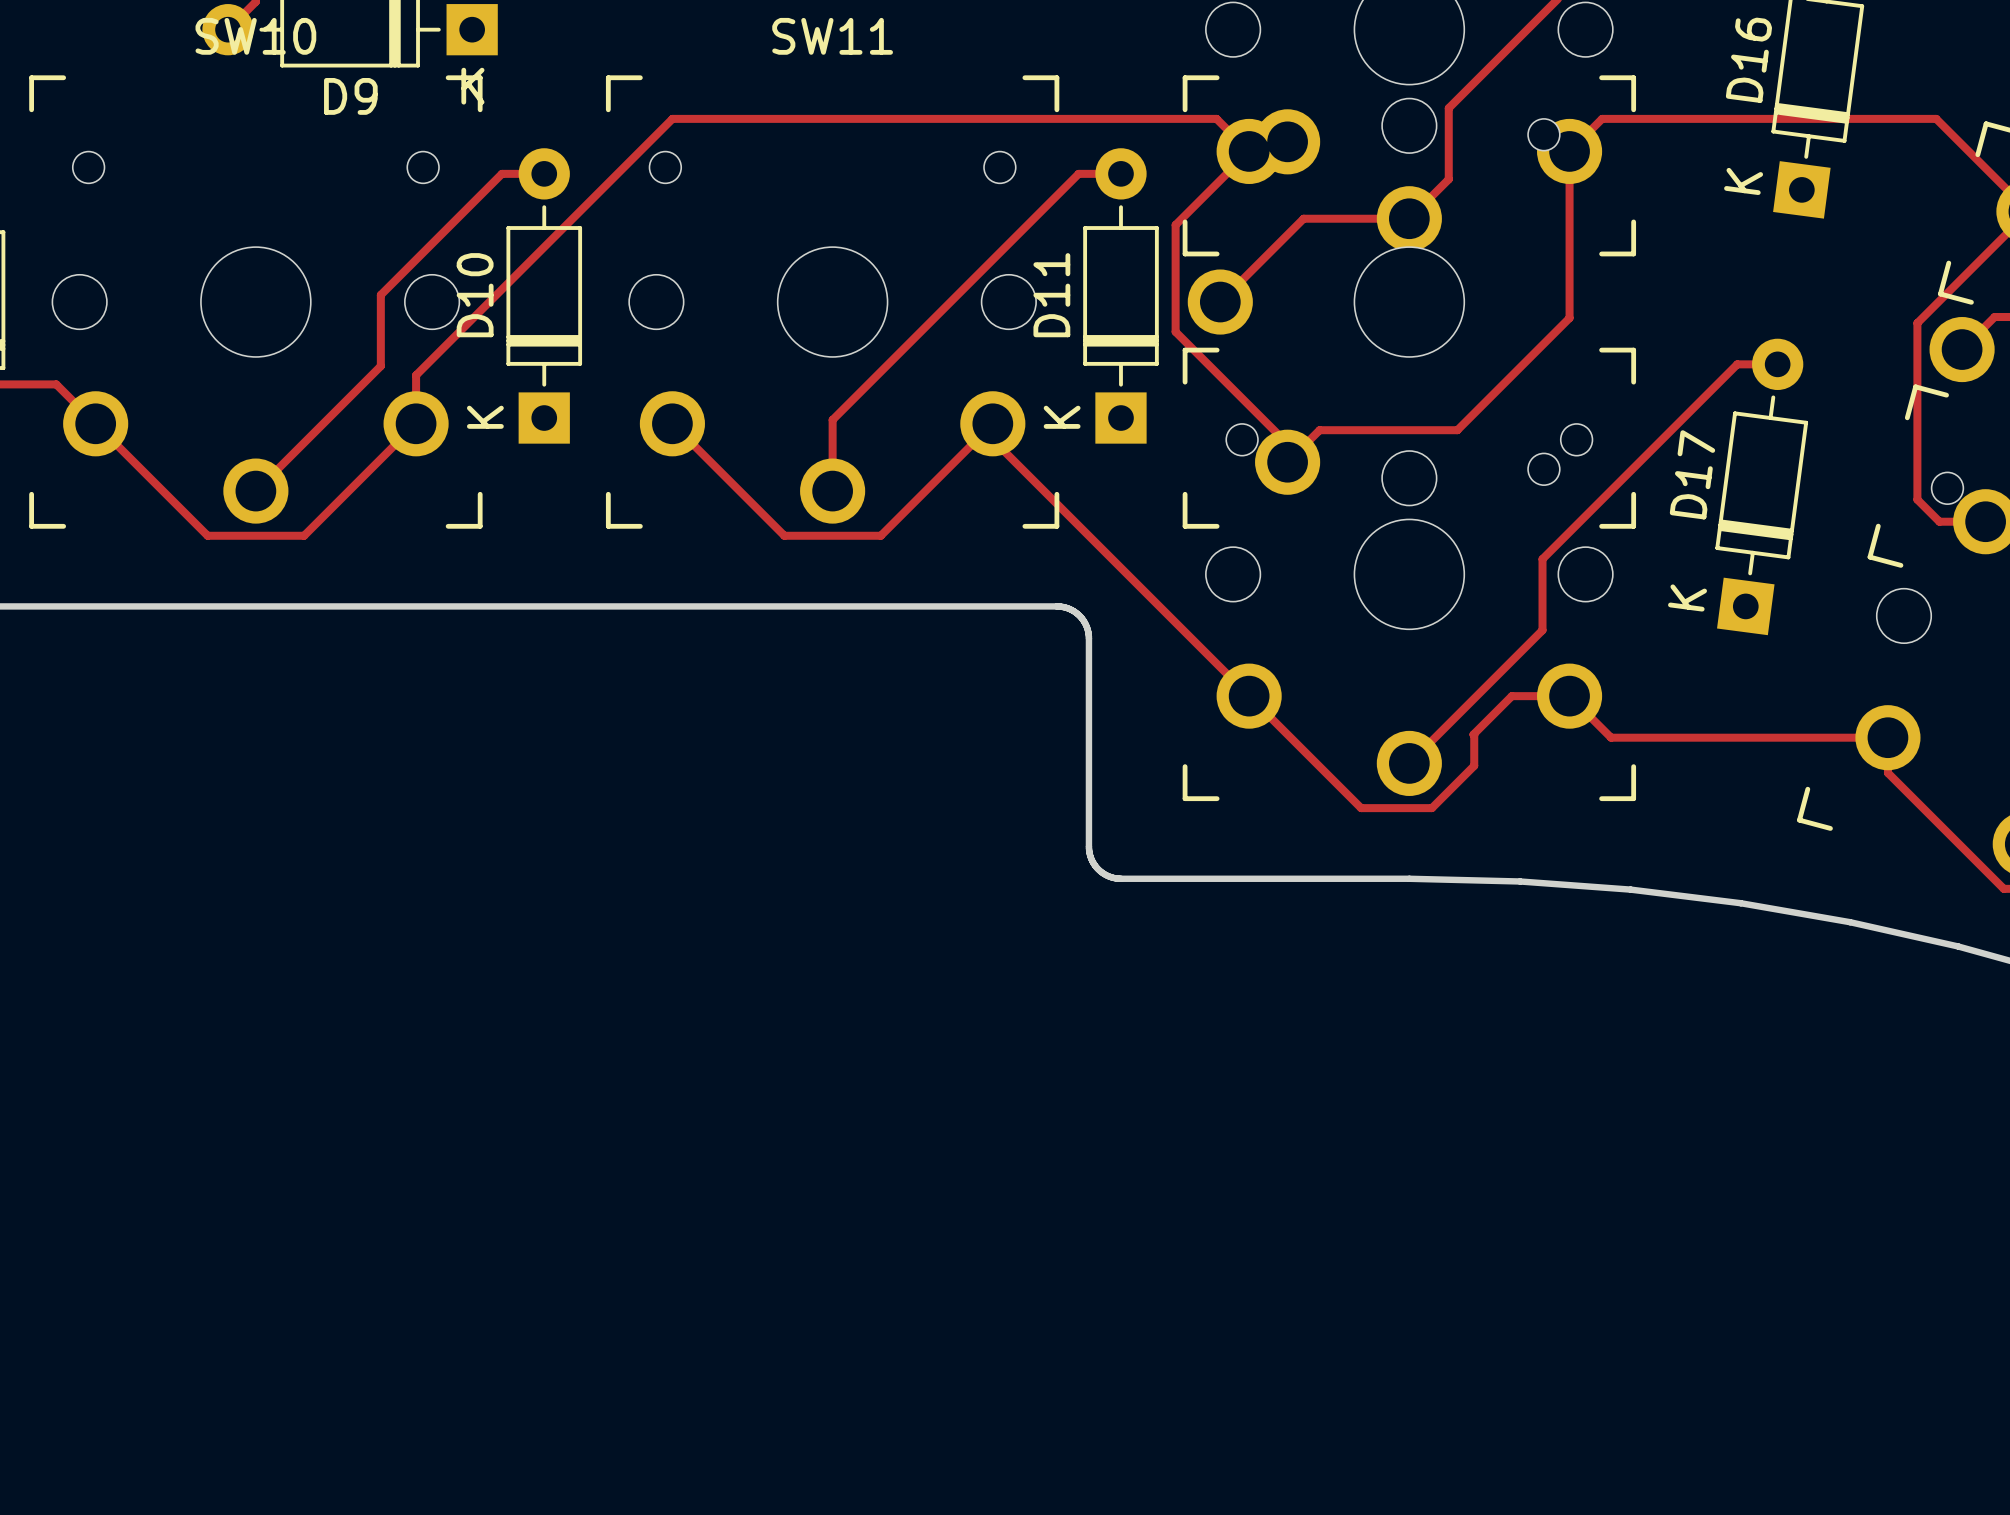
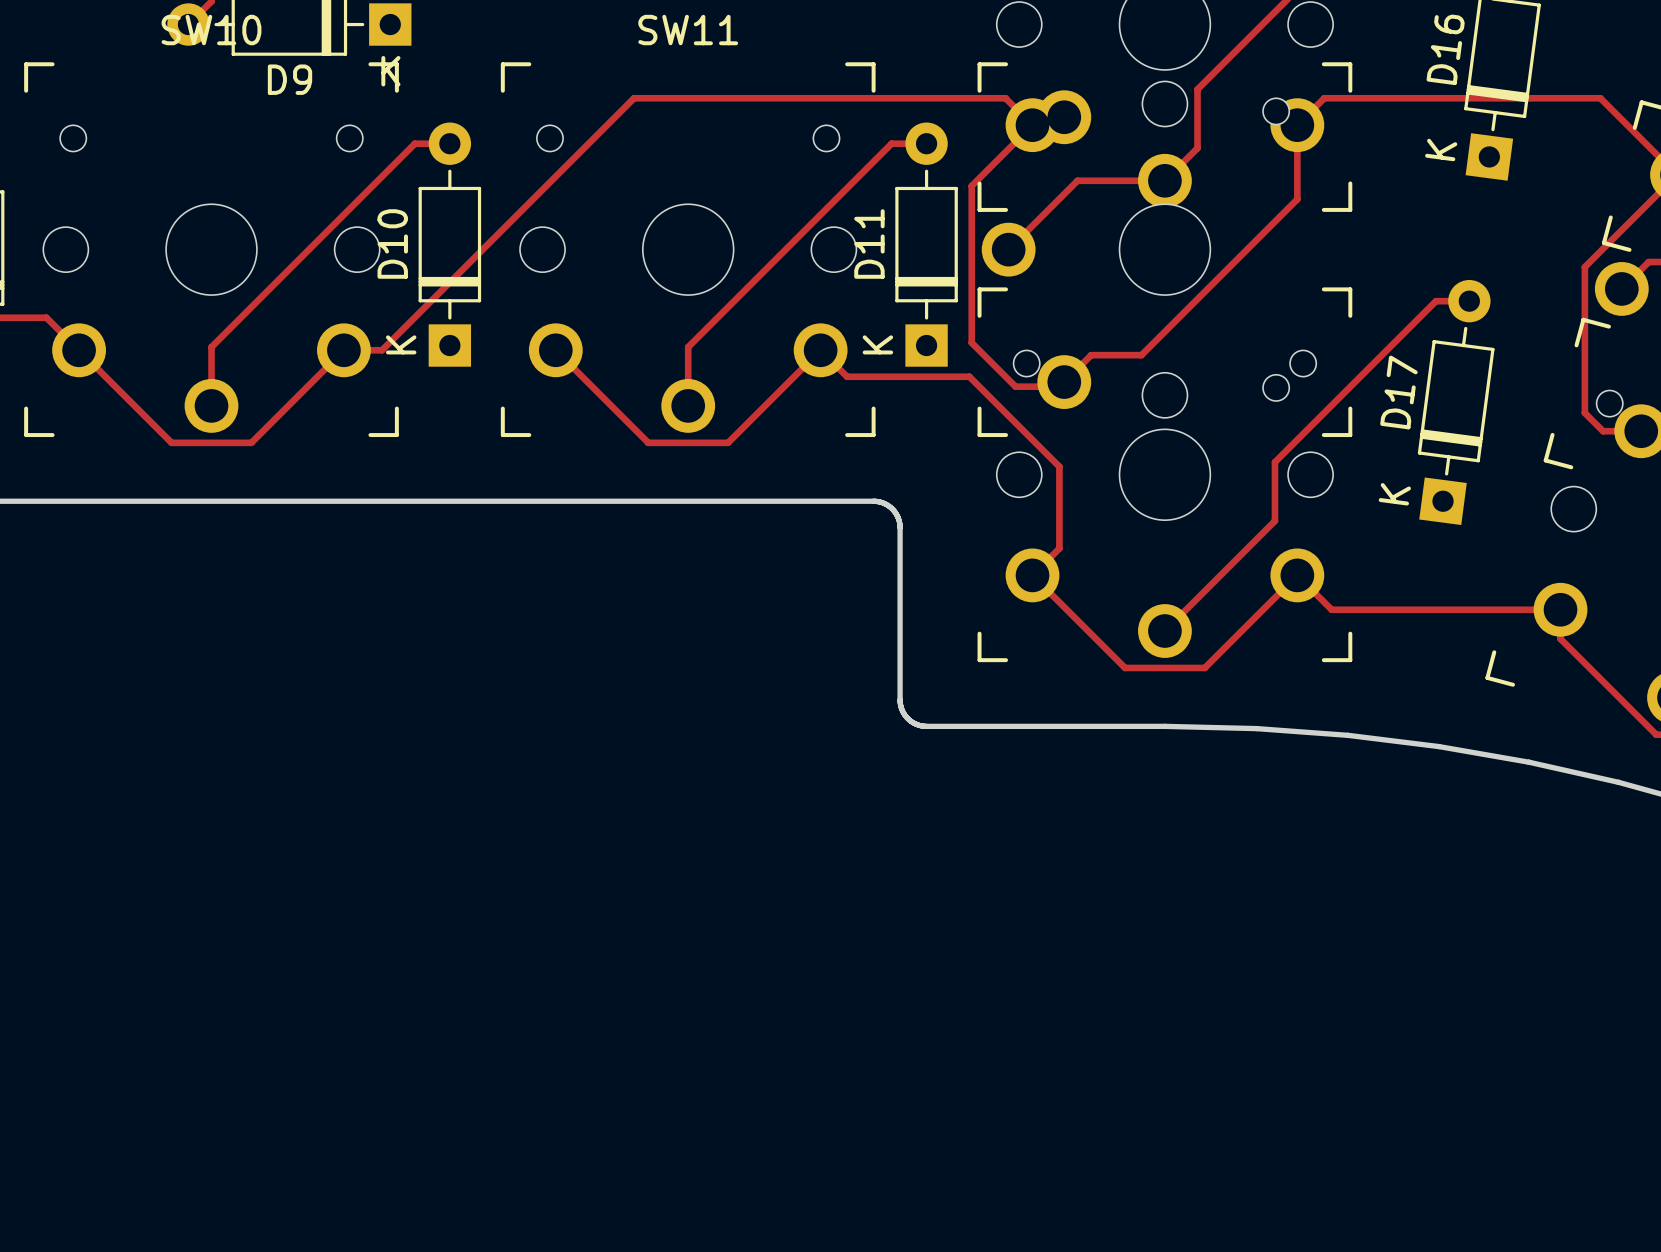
track: (767, 118) (672, 118) (416, 375) (416, 423) -> (634, 98) (381, 350) (343, 350)
track: (1569, 241) (1569, 318) (1457, 430) (1319, 430) -> (1297, 199) (1141, 355) (1090, 355)
track: (380, 294) (380, 366) (255, 491) -> (314, 243) (211, 347) (211, 405)
track: (1175, 331) (1287, 443) (1287, 462) -> (971, 274) (971, 342) (1015, 386) (1059, 386) (1064, 382)
track: (992, 423) (992, 439) (1249, 696) -> (820, 350) (847, 376) (969, 376) (1059, 466) (1059, 548) (1032, 575)
track: (1569, 696) (1511, 696) (1473, 734) (1474, 765) (1431, 808) -> (1297, 575) (1204, 667) (1183, 667)

